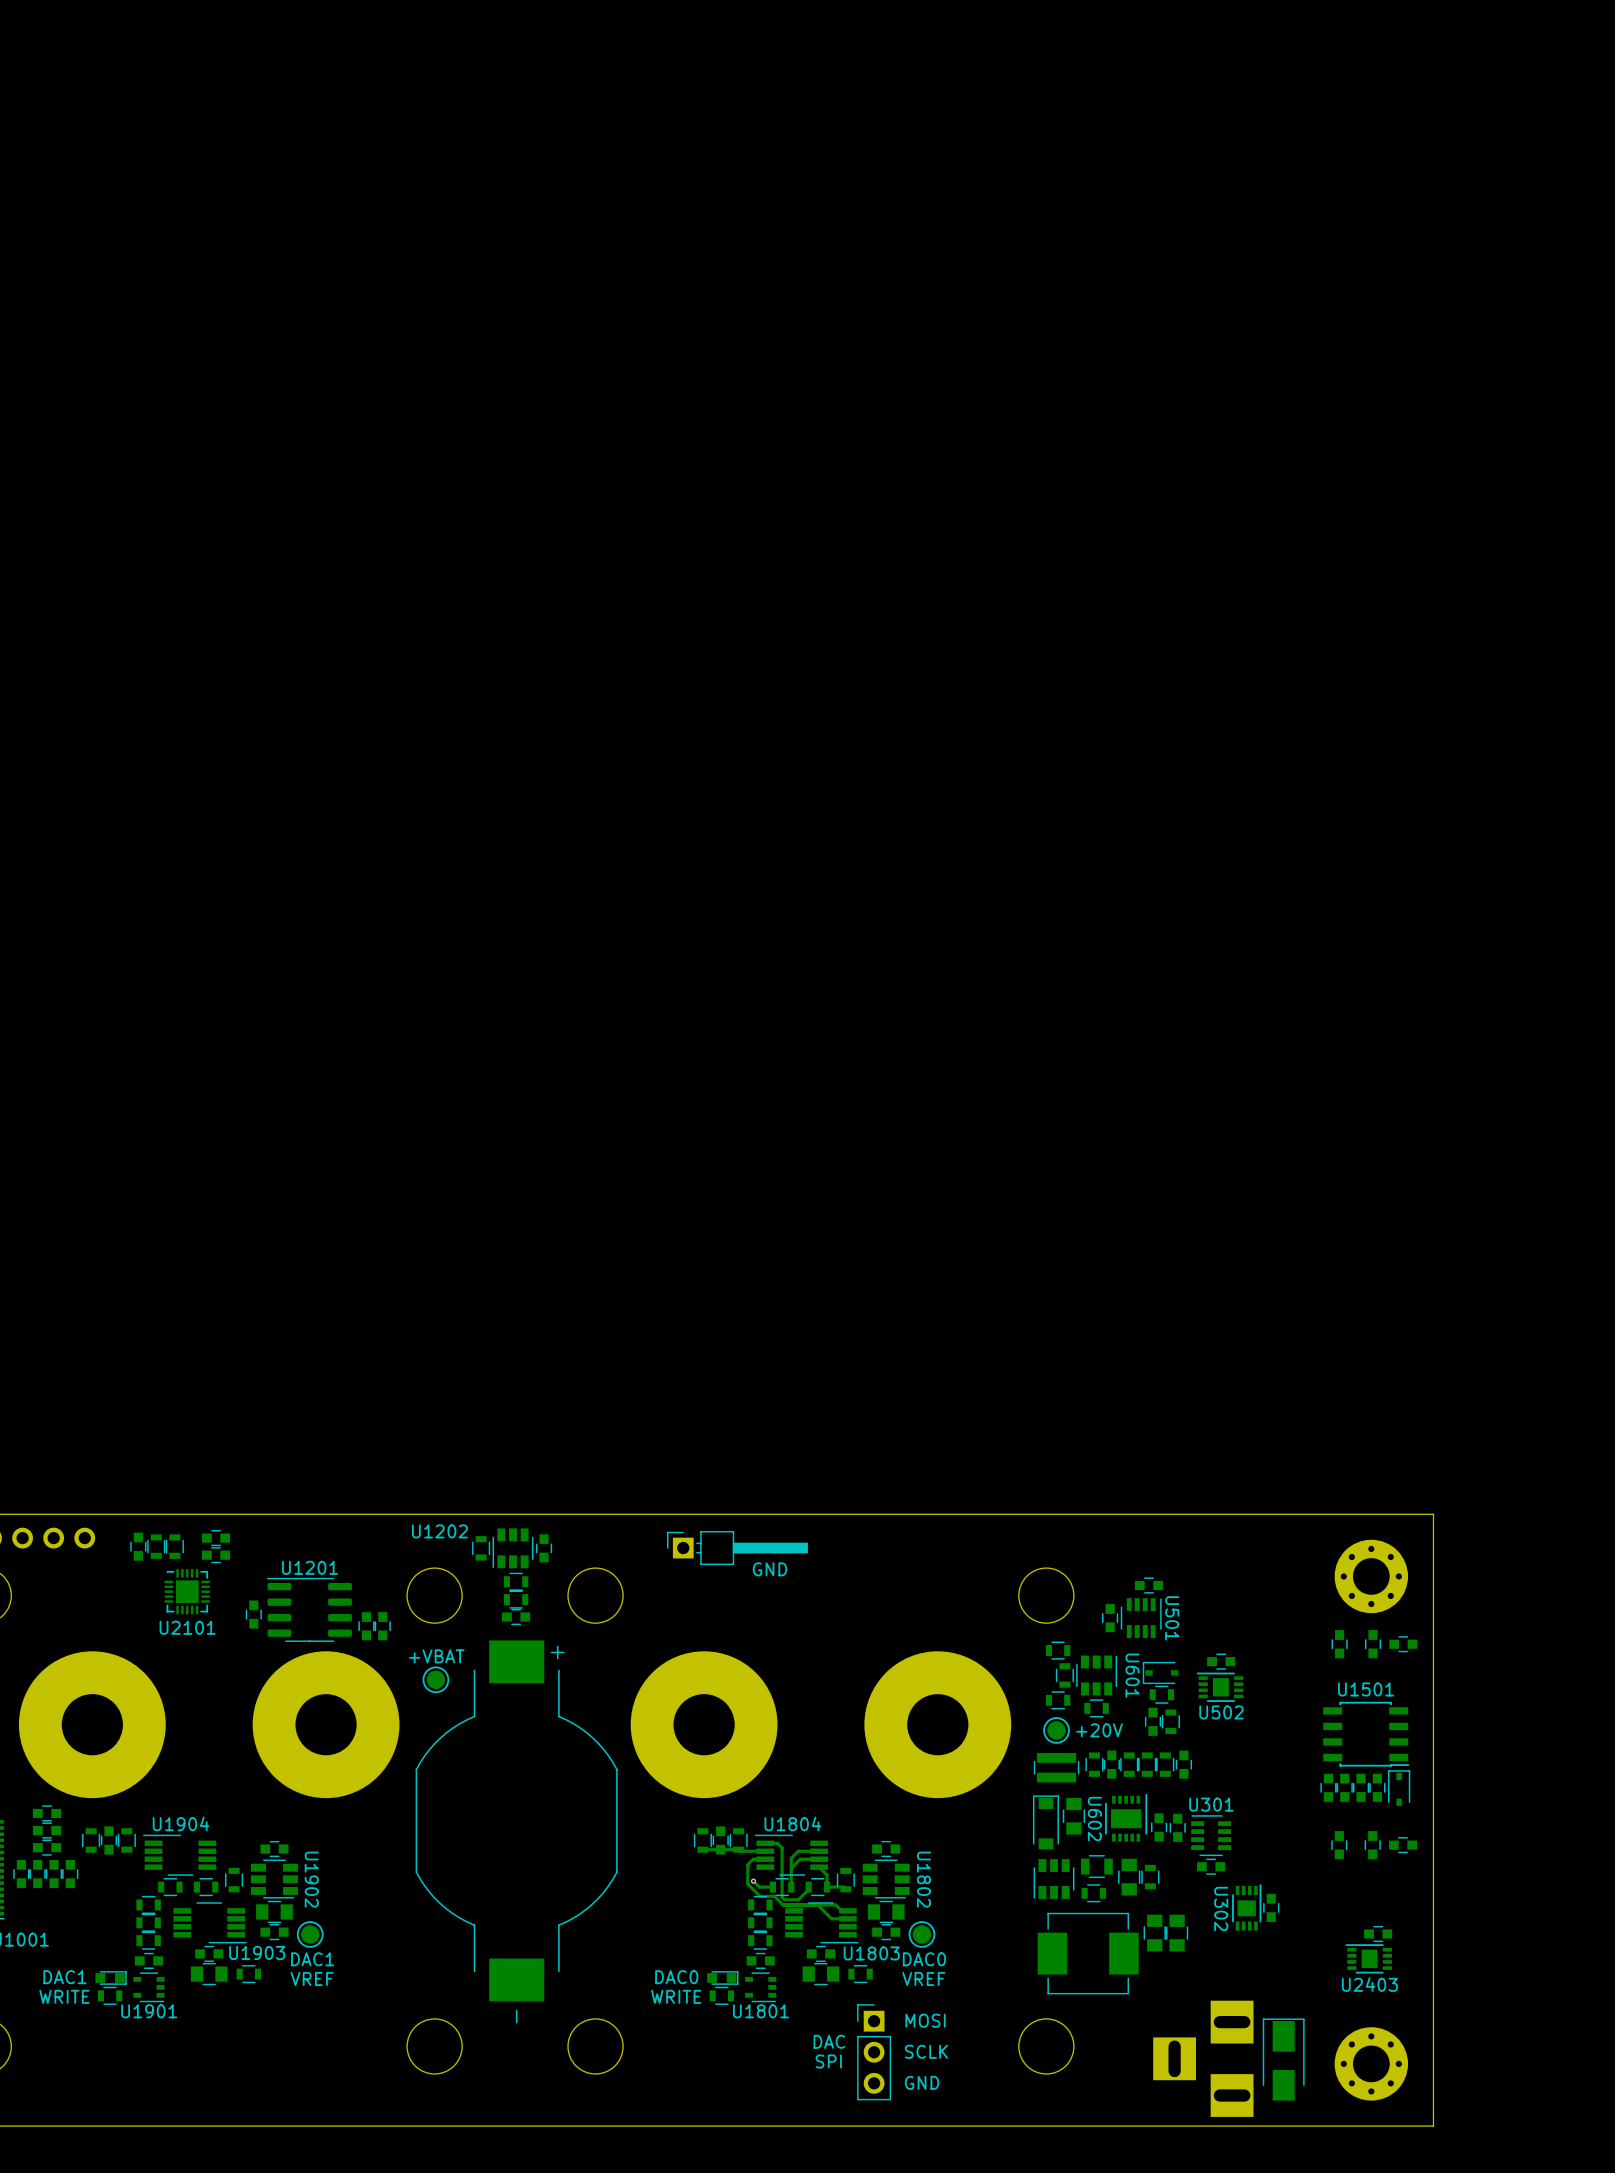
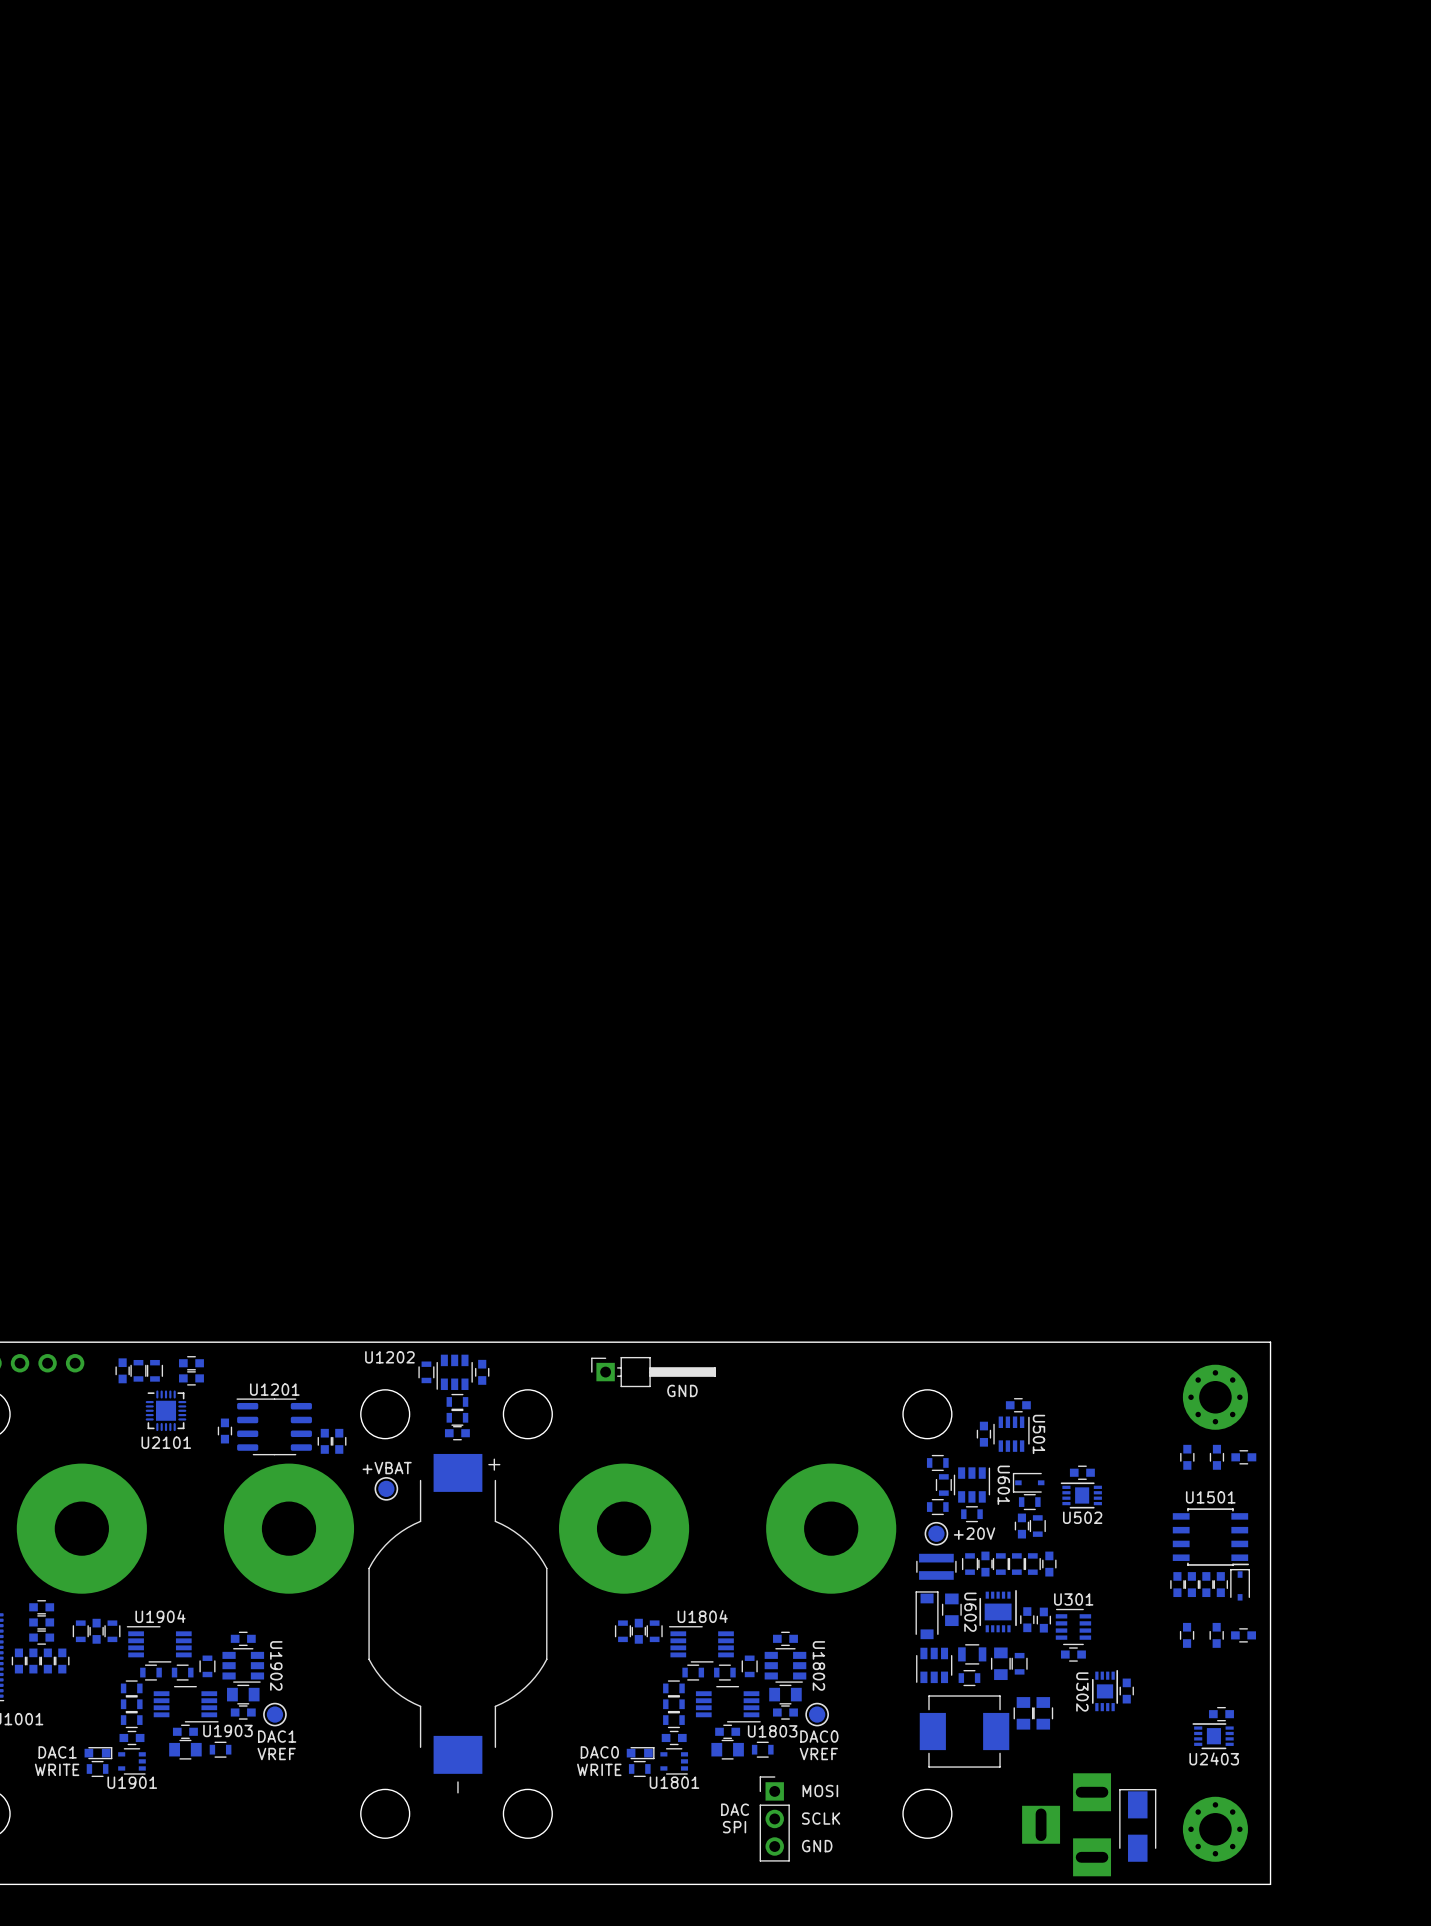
track: (765, 1843) (777, 1843) (782, 1848) (782, 1897) (784, 1899) (798, 1899) (808, 1889) (808, 1887) -> none
track: (702, 1849) (765, 1851) -> none
track: (819, 1851) (798, 1851) (791, 1858) (791, 1887) -> none
track: (765, 1859) (753, 1859) (747, 1864) (747, 1883) (760, 1896) (774, 1896) (783, 1905) (835, 1905) (841, 1910) (847, 1910) -> none
track: (819, 1859) (800, 1859) (791, 1868) -> none
track: (819, 1867) (827, 1875) (827, 1887) (843, 1887) (845, 1889) -> none
track: (753, 1881) (759, 1887) (772, 1887) -> none
via: (753, 1881) -> none
track: (817, 1905) (831, 1918) (847, 1918) -> none

